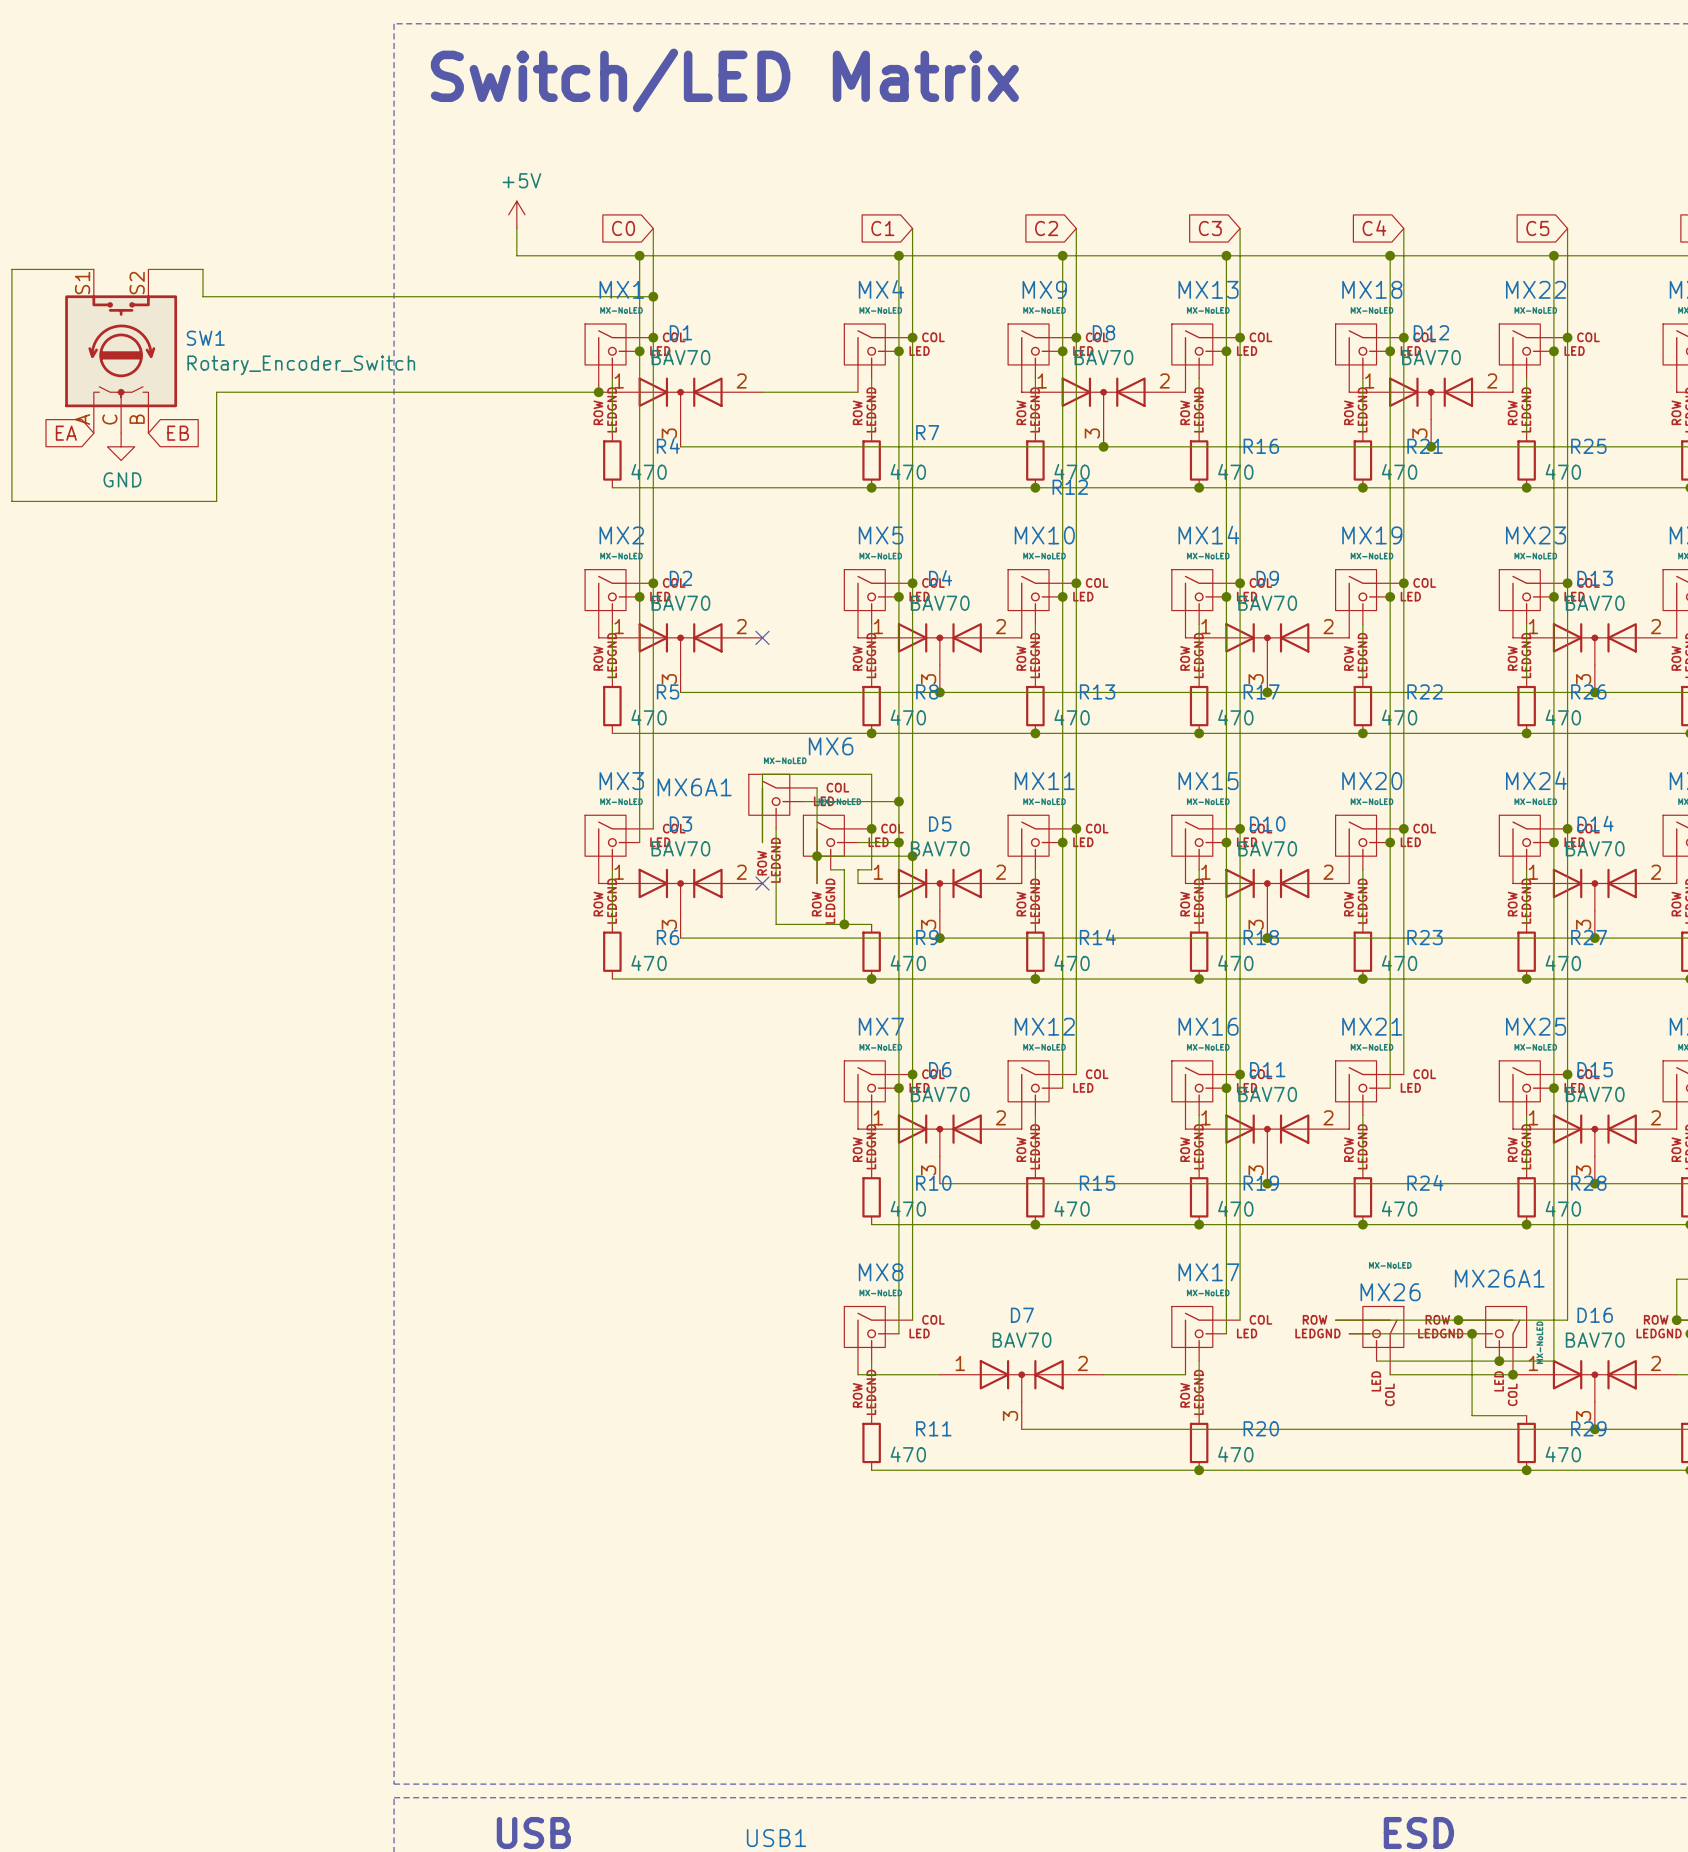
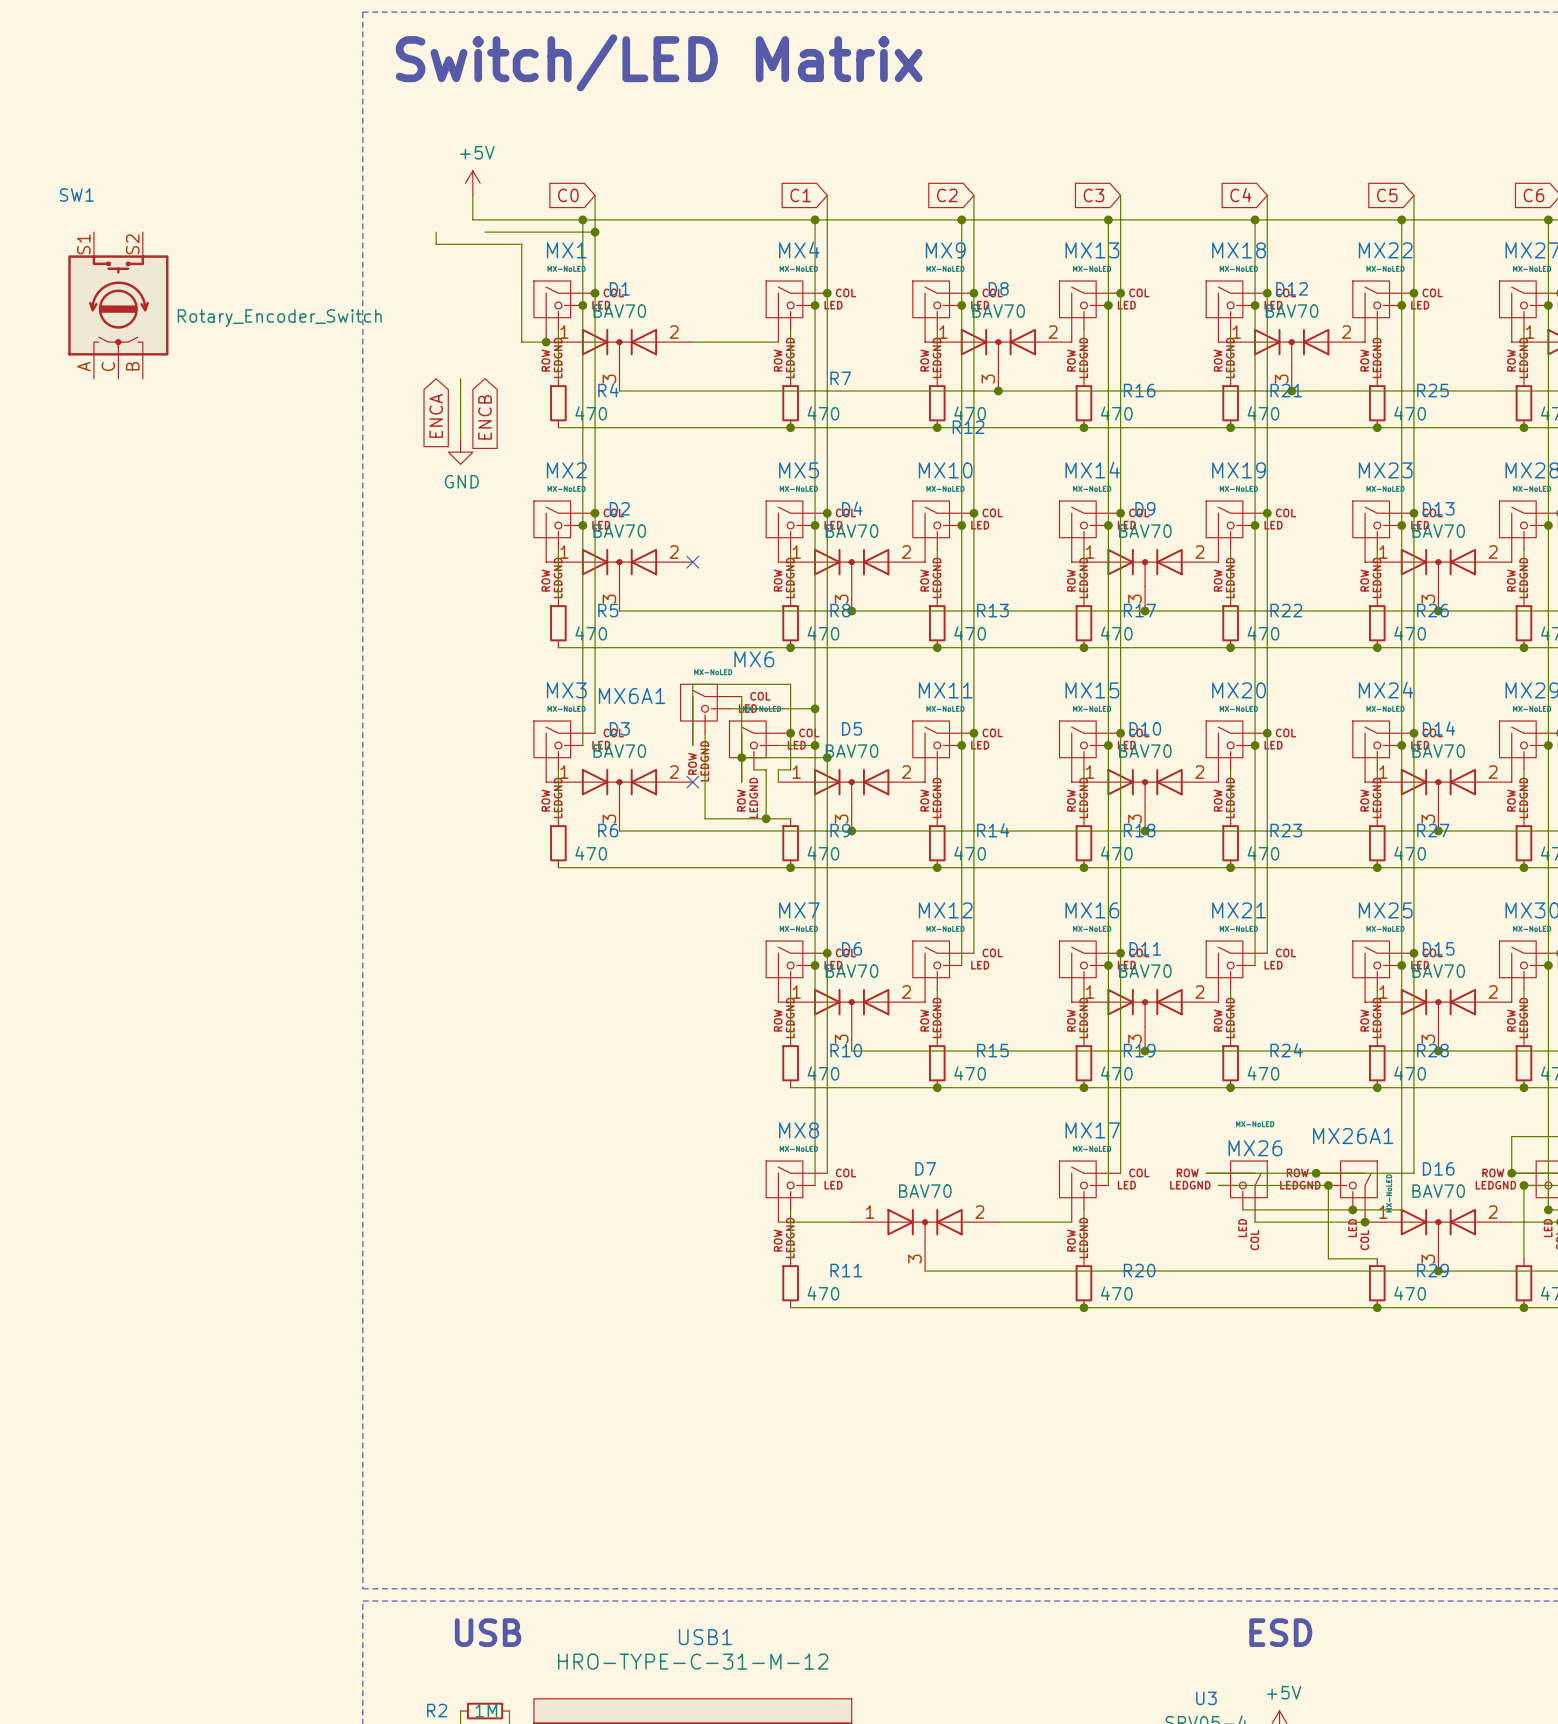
wire: (93, 269) (11, 269) (11, 501) (216, 501) (216, 392) (571, 392) -> (436, 232) (436, 244) (521, 244) (521, 342)
wire: (148, 269) (202, 269) (202, 296) (653, 296) -> none
wire: none -> (485, 232) (595, 232)
junction position: (653, 296) -> (595, 232)
SW1 name position: SW1 (205, 338) -> SW1 (76, 194)
global label: EA (66, 433) -> none
global label: EB (178, 433) -> none
wire: none -> (460, 378) (460, 439)
power symbol: GND (121, 446) -> none
global label: none -> ENCA (436, 415)
global label: none -> ENCB (485, 417)
power symbol: none -> GND (460, 452)

